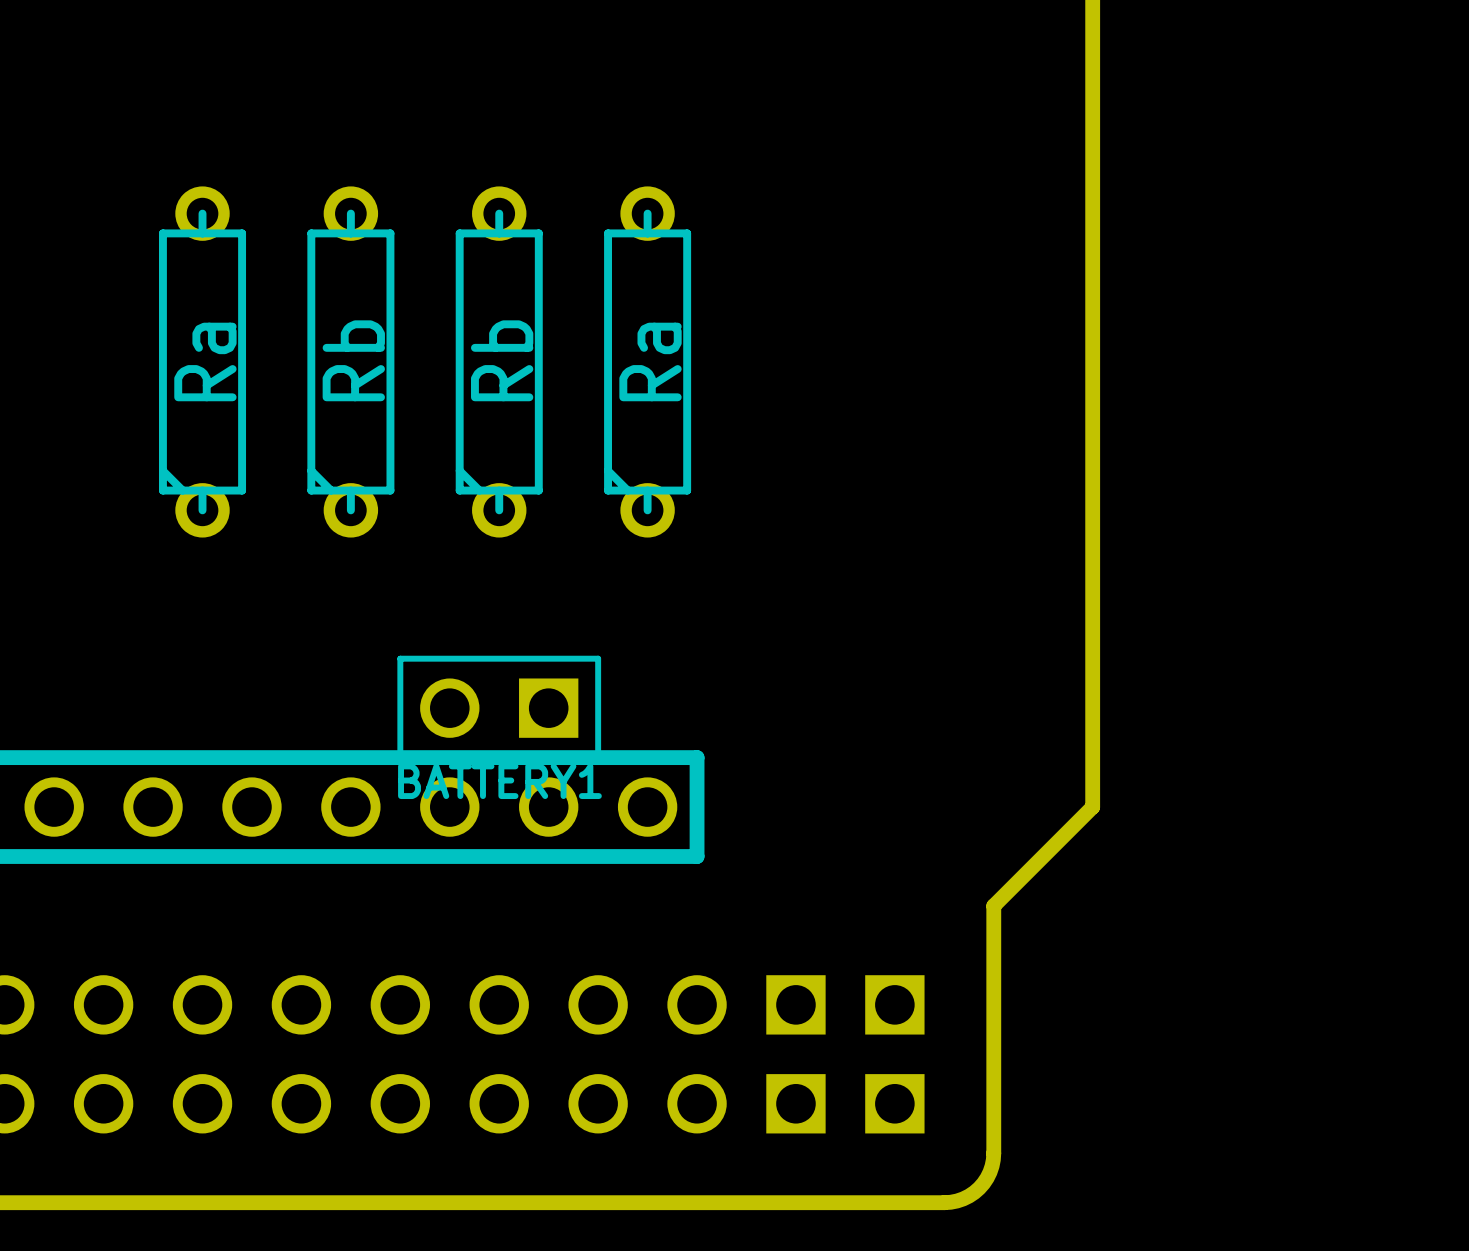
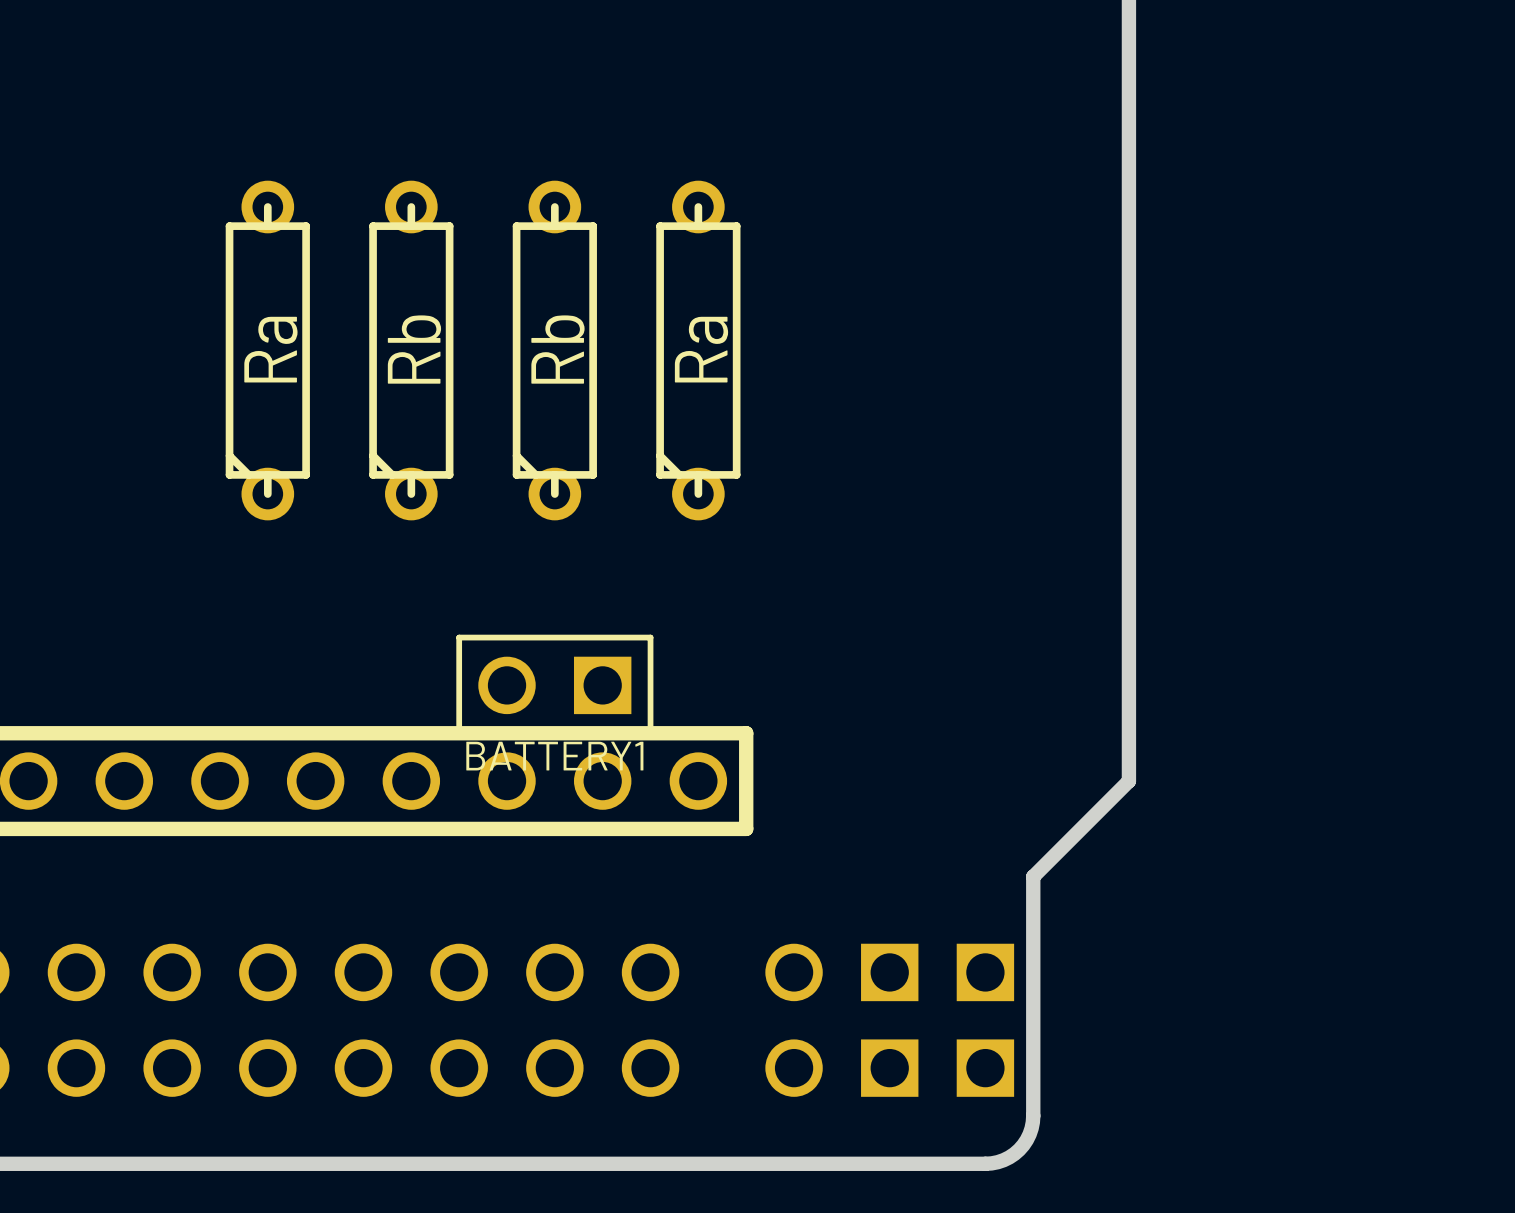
part position: (795, 1054) -> (889, 1020)

